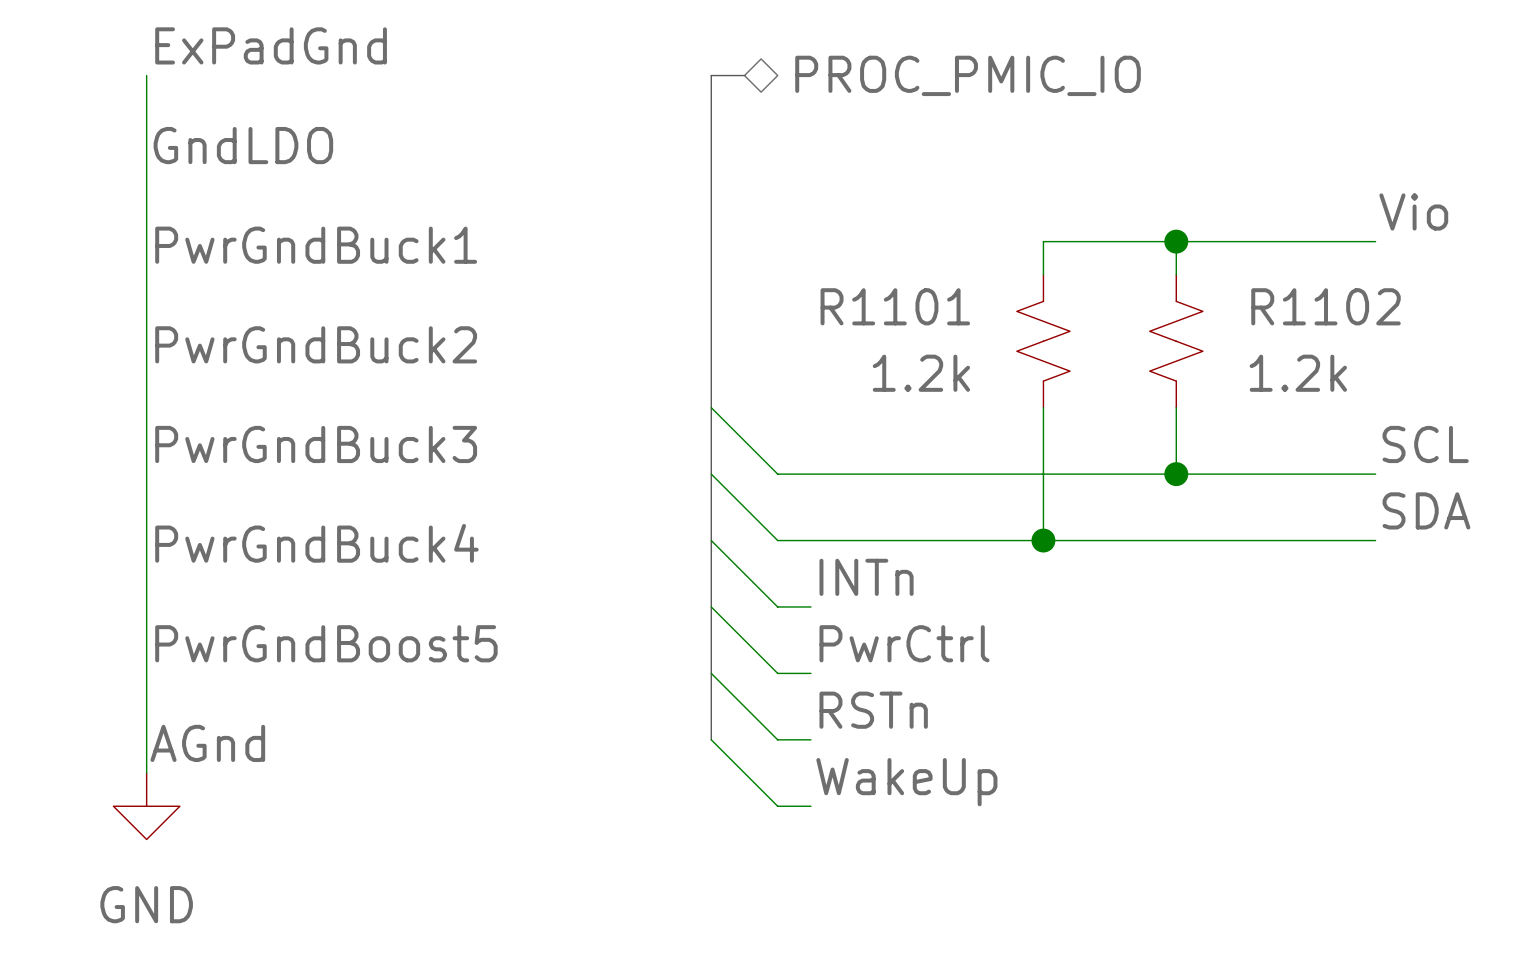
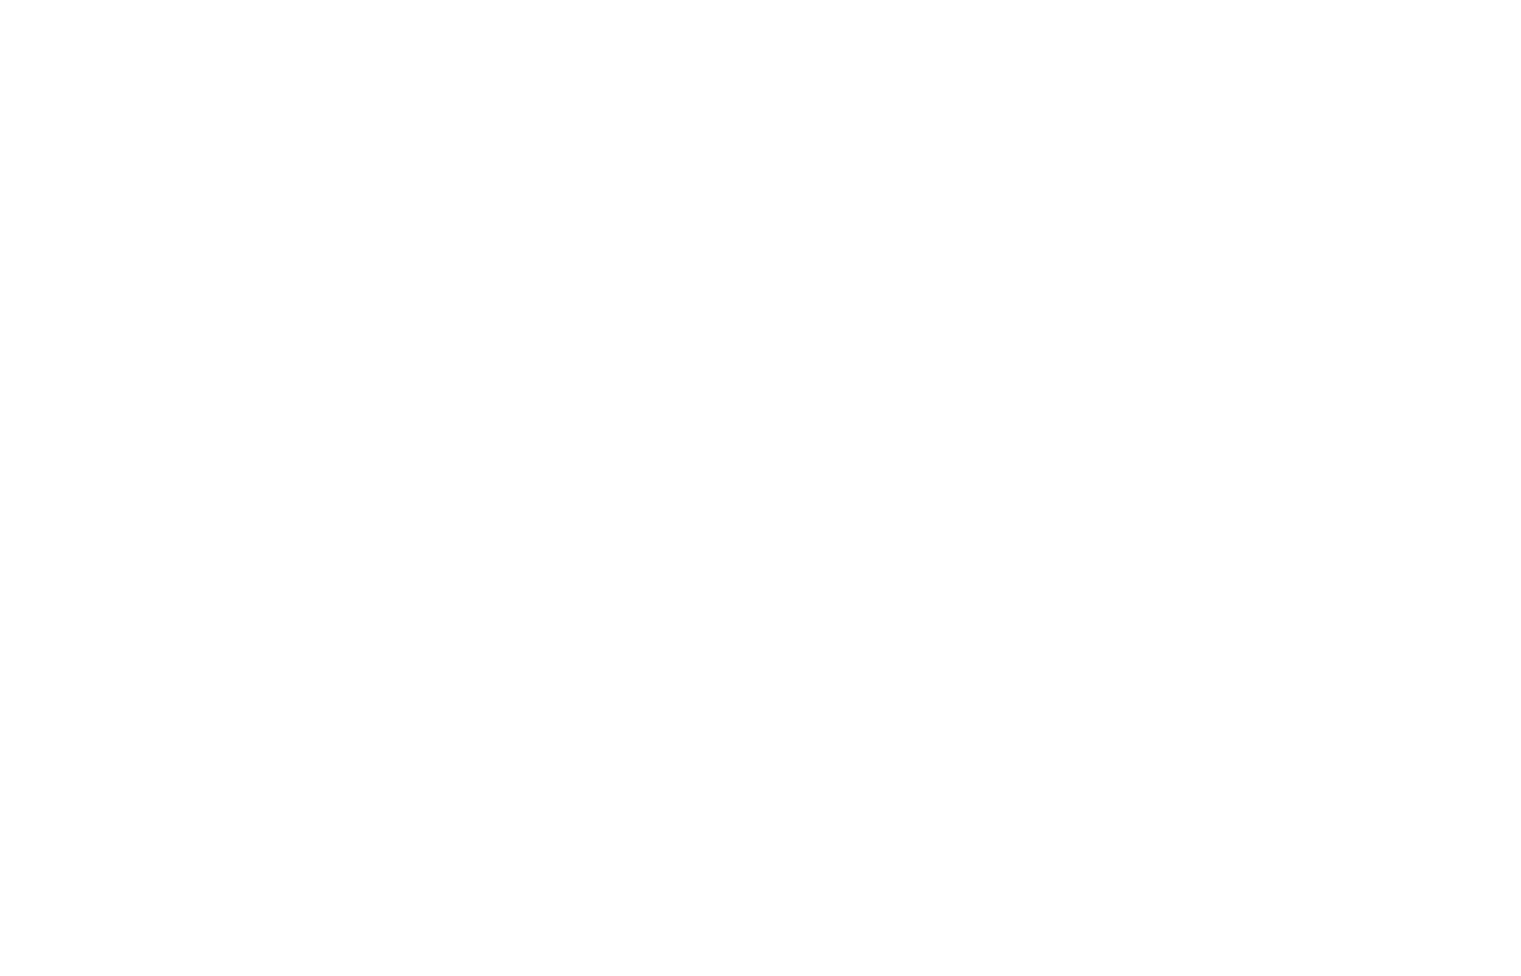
label: ExPadGnd (271, 45) -> none
wire: (146, 75) (146, 773) -> none
bus: (744, 75) (711, 75) (711, 739) -> none
hierarchical label: PROC_PMIC_IO (968, 75) -> none
label: GndLDO (243, 145) -> none
label: Vio (1413, 211) -> none
wire: (1176, 241) (1176, 274) -> none
junction: (1176, 241) -> none
wire: (1375, 241) (1043, 241) (1043, 274) -> none
label: PwrGndBuck1 (316, 245) -> none
R1101: 1.2k (1043, 341) -> none
R1102: 1.2k (1176, 341) -> none
label: PwrGndBuck2 (316, 344) -> none
wire: (711, 407) (777, 474) (1375, 474) -> none
wire: (1043, 407) (1043, 540) -> none
wire: (1176, 407) (1176, 474) -> none
label: PwrGndBuck3 (316, 444) -> none
label: SCL (1425, 444) -> none
wire: (711, 474) (777, 540) (1375, 540) -> none
junction: (1176, 474) -> none
label: SDA (1426, 510) -> none
wire: (711, 540) (777, 606) (810, 606) -> none
junction: (1043, 540) -> none
label: PwrGndBuck4 (316, 543) -> none
label: INTn (866, 577) -> none
wire: (711, 606) (777, 673) (810, 673) -> none
label: PwrGndBoost5 (326, 643) -> none
label: PwrCtrl (904, 643) -> none
wire: (711, 673) (777, 739) (810, 739) -> none
label: RSTn (873, 710) -> none
wire: (711, 739) (777, 806) (810, 806) -> none
label: AGnd (207, 743) -> none
label: WakeUp (906, 782) -> none
power symbol: GND (146, 806) -> none

